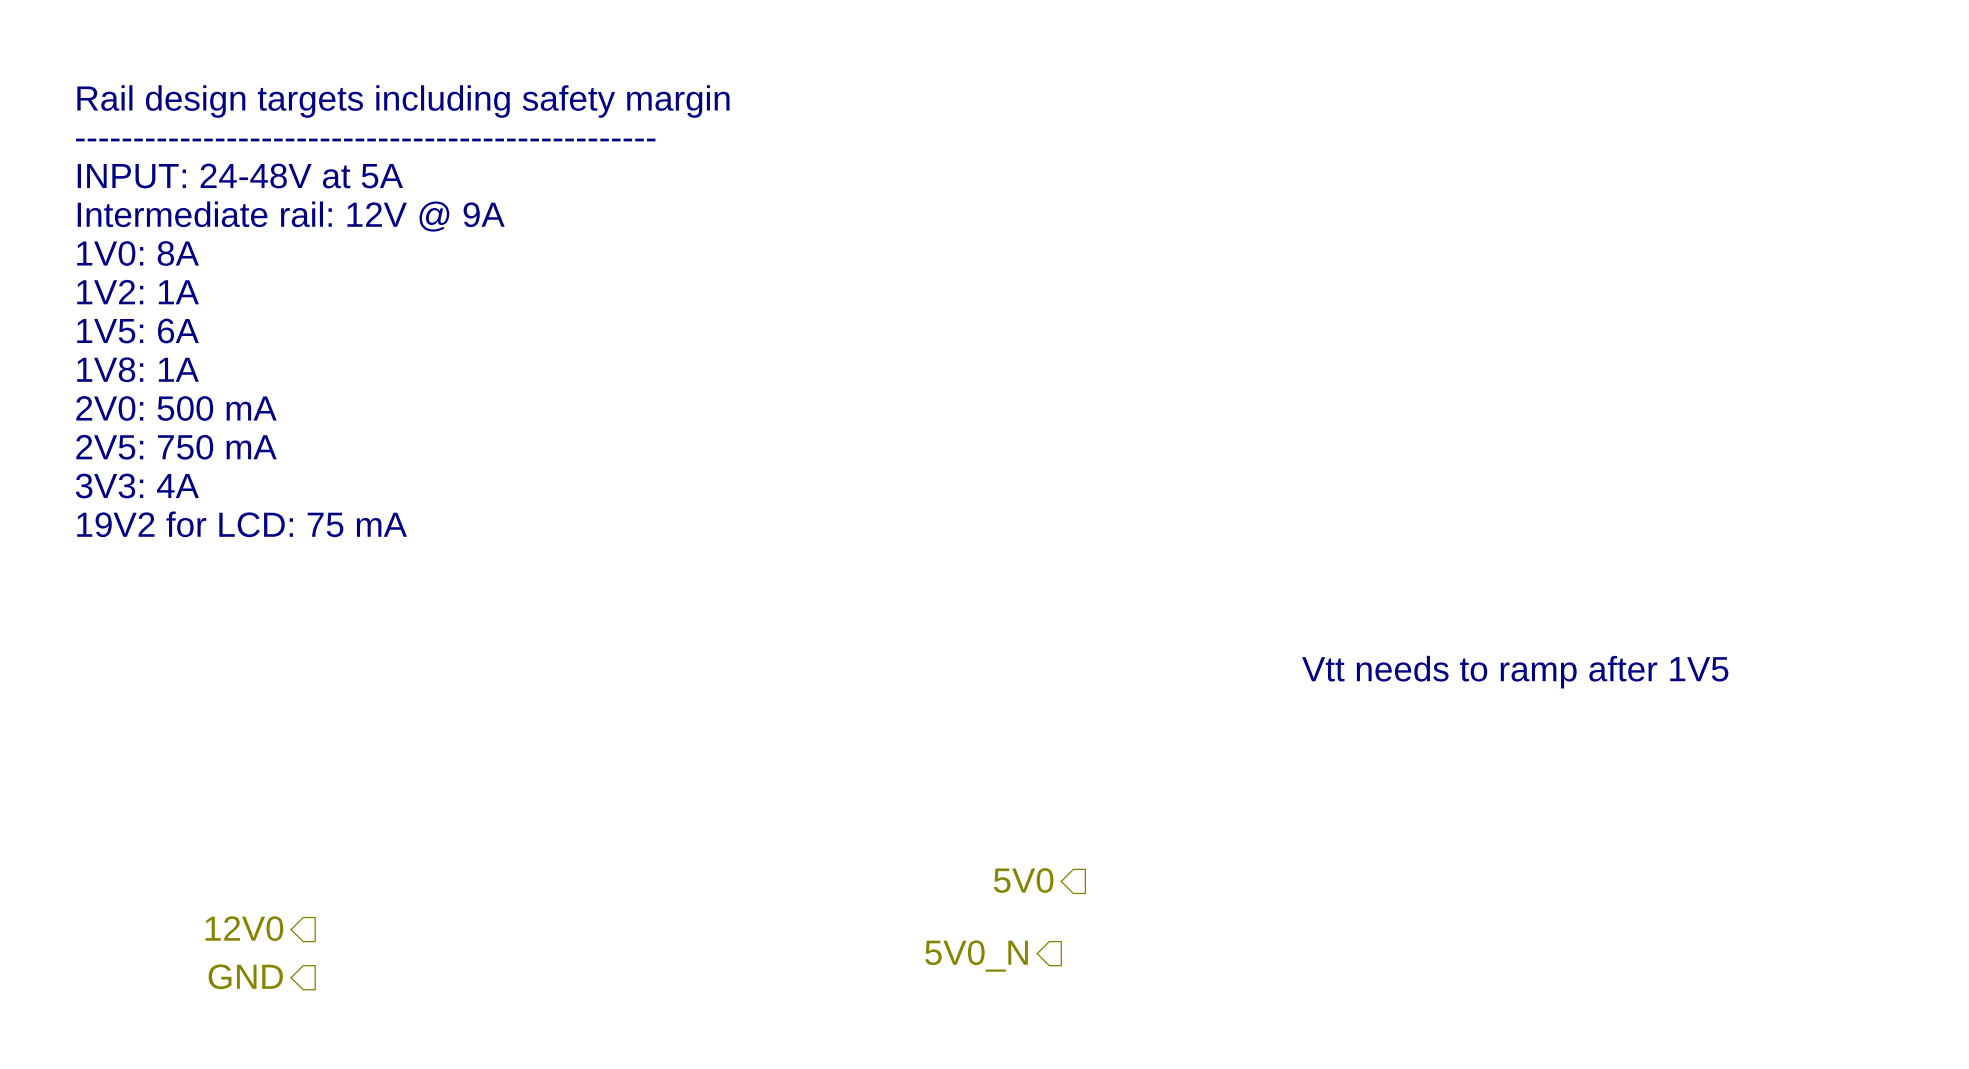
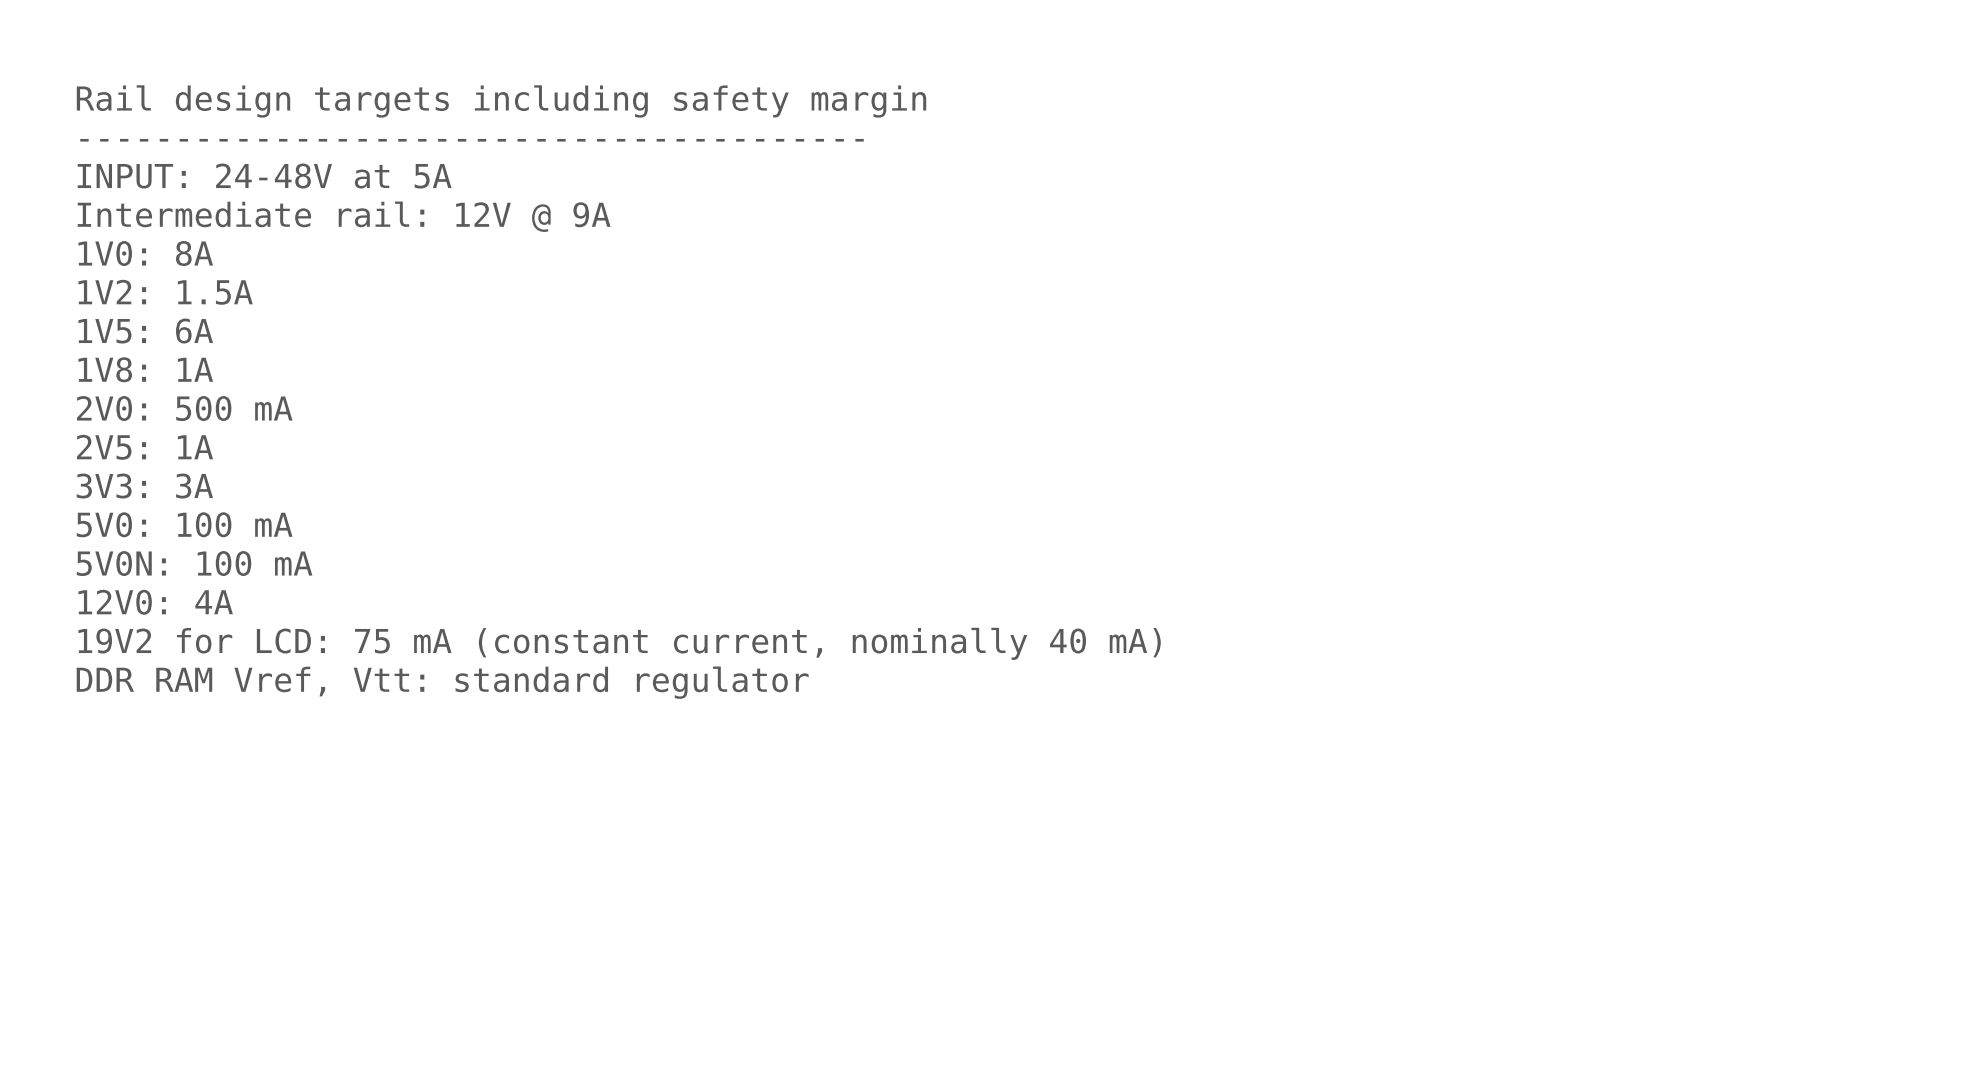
text: -------------------------------------------------- (365, 140) -> ---------------------------------------- (472, 140)
text: 1V2: 1A (138, 292) -> 1V2: 1.5A (165, 292)
text: 2V5: 750 mA (176, 447) -> 2V5: 1A (144, 447)
text: 3V3: 4A (137, 486) -> 3V3: 3A (144, 486)
text: 19V2 for LCD: 75 mA (242, 524) -> 5V0: 100 mA (184, 524)
text: none -> 5V0N: 100 mA (194, 563)
text: none -> 12V0: 4A (155, 602)
text: none -> 19V2 for LCD: 75 mA (constant current, nominally 40 mA) (619, 643)
text: Vtt needs to ramp after 1V5 (1515, 672) -> none
text: none -> DDR RAM Vref, Vtt: standard regulator (442, 682)
hierarchical label: 5V0 (1023, 880) -> none
hierarchical label: 12V0 (244, 928) -> none
hierarchical label: 5V0_N (976, 956) -> none
hierarchical label: GND (245, 976) -> none

